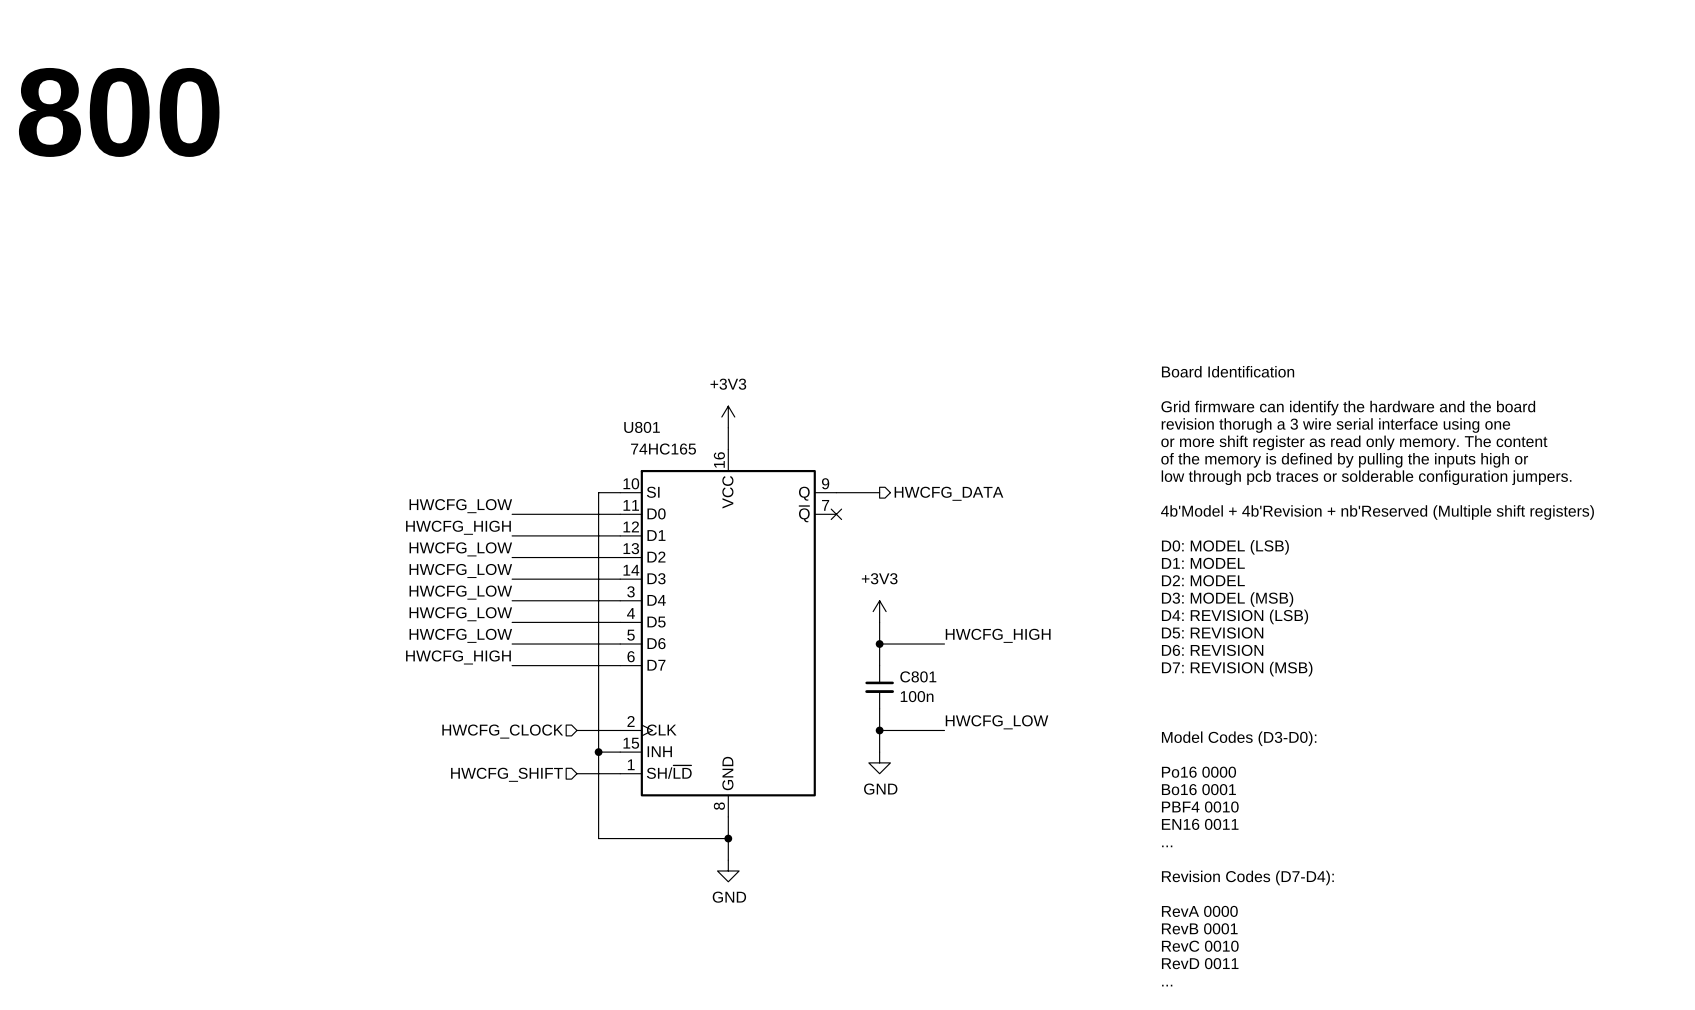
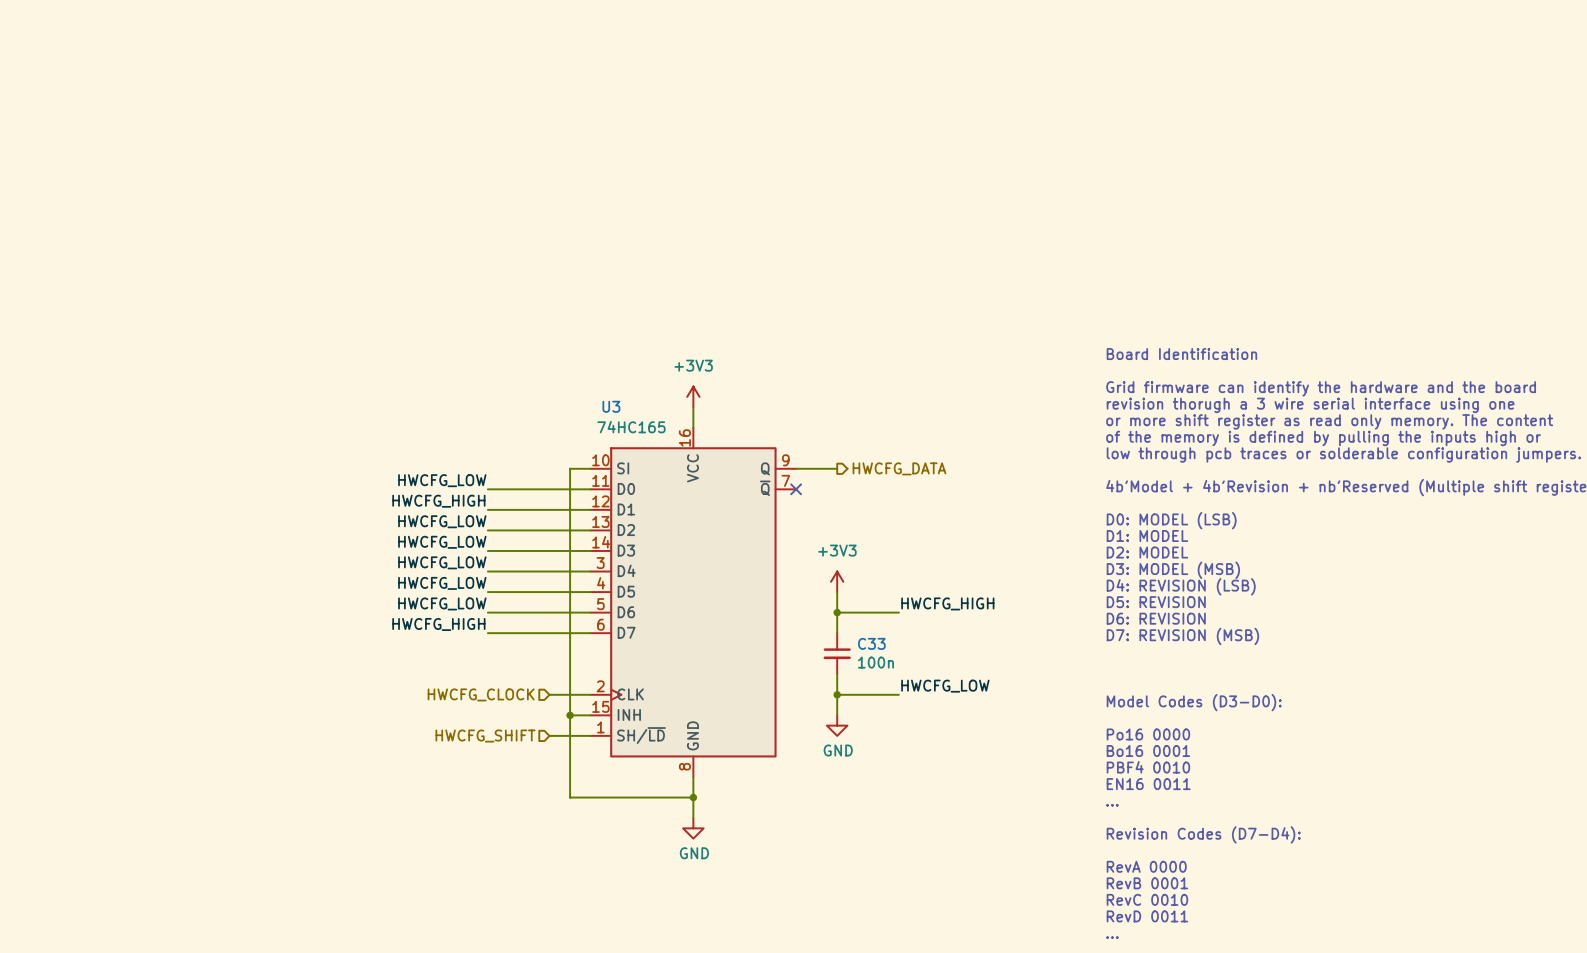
text: 800 (119, 112) -> none
U801 name: U801 (642, 427) -> U3 (611, 406)
C801 name: C801 (918, 676) -> C33 (871, 643)

